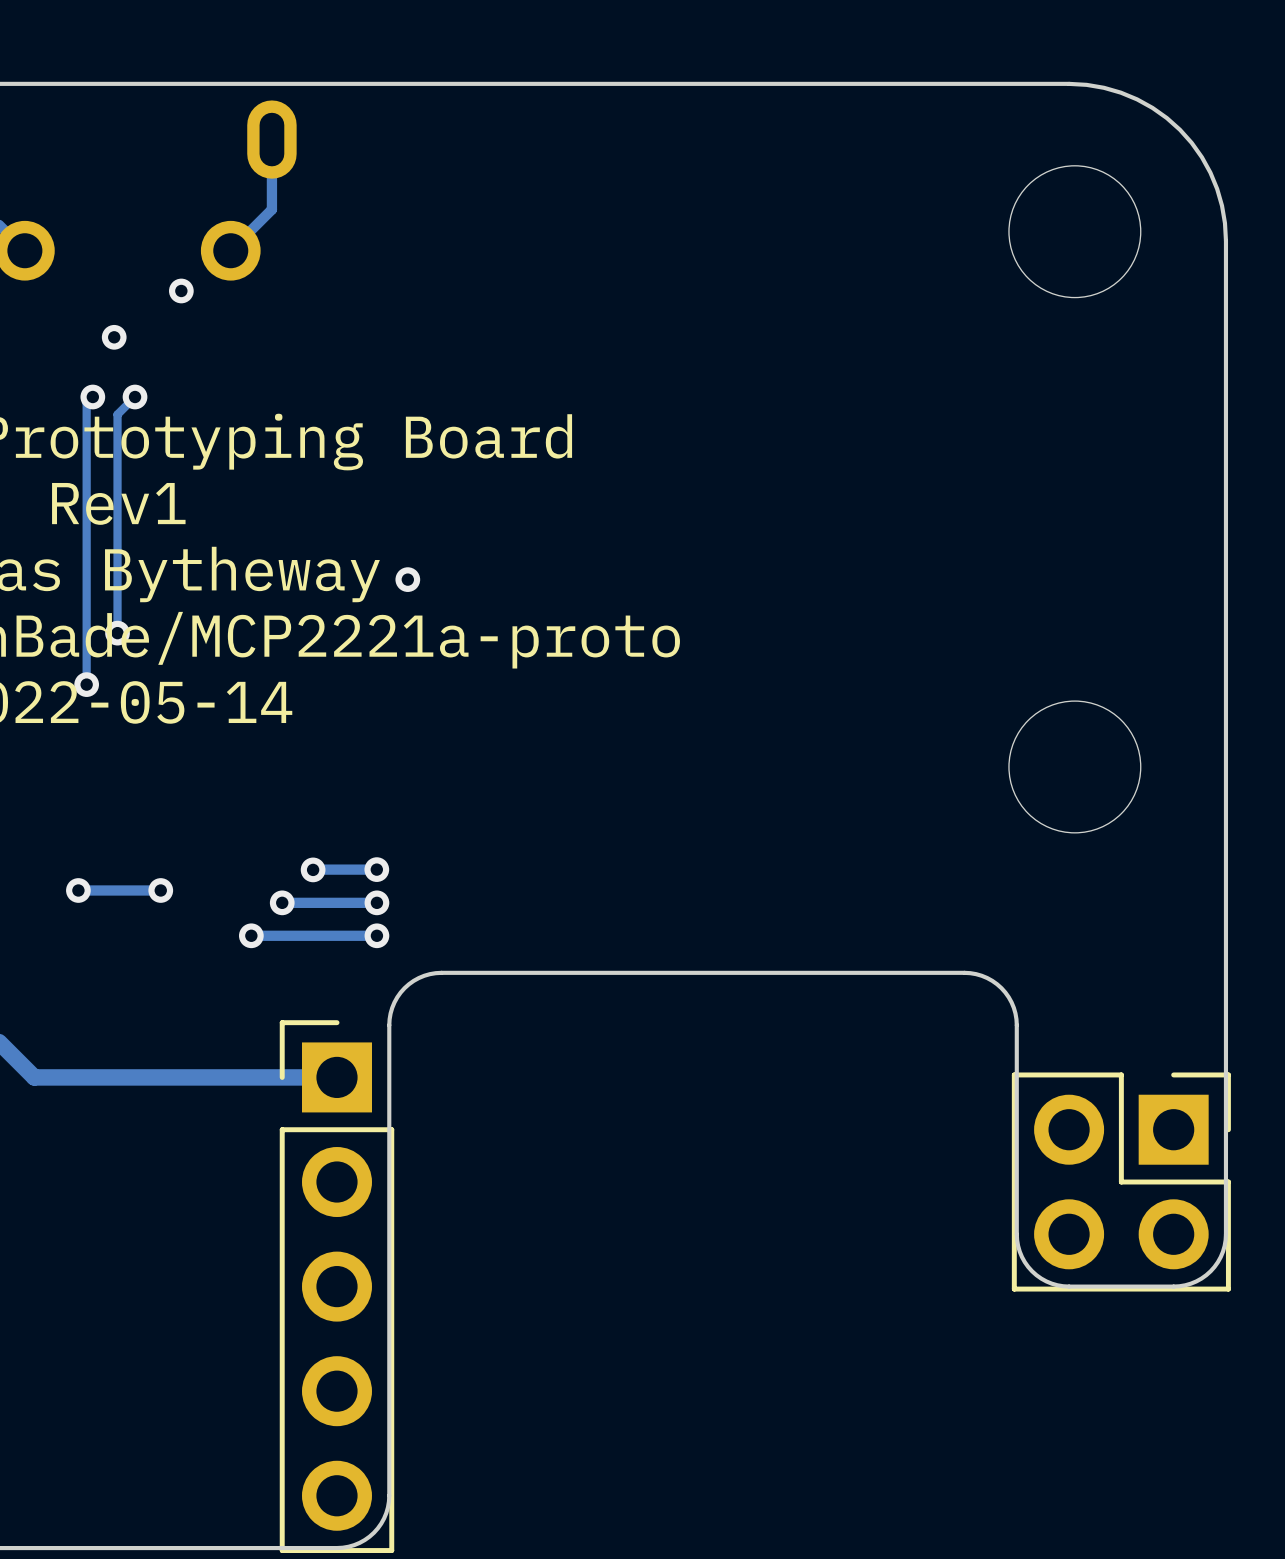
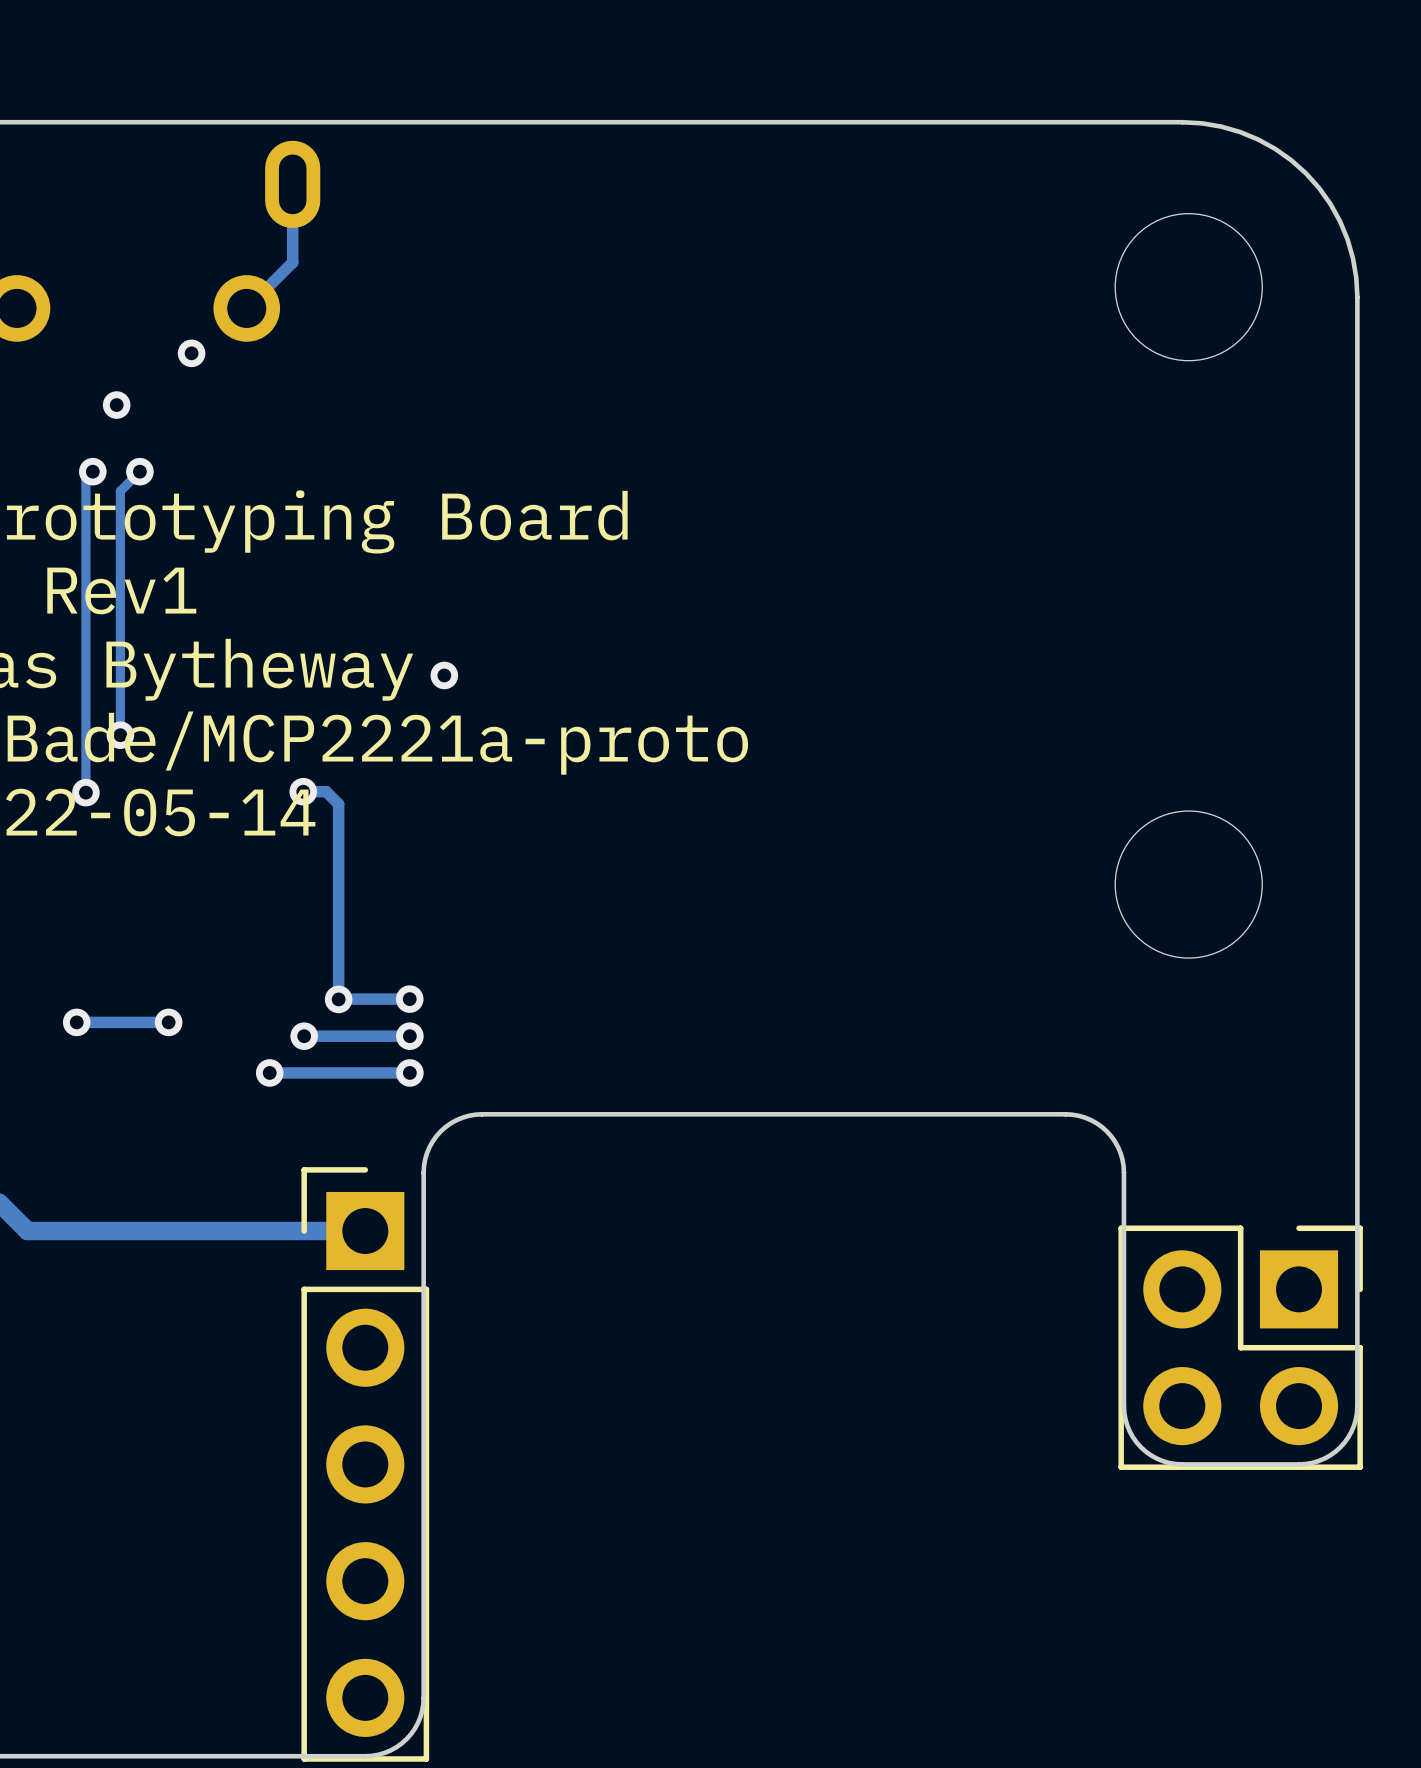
track: none -> (303, 791) (326, 791) (338, 804) (338, 999)
via: none -> (303, 791)

